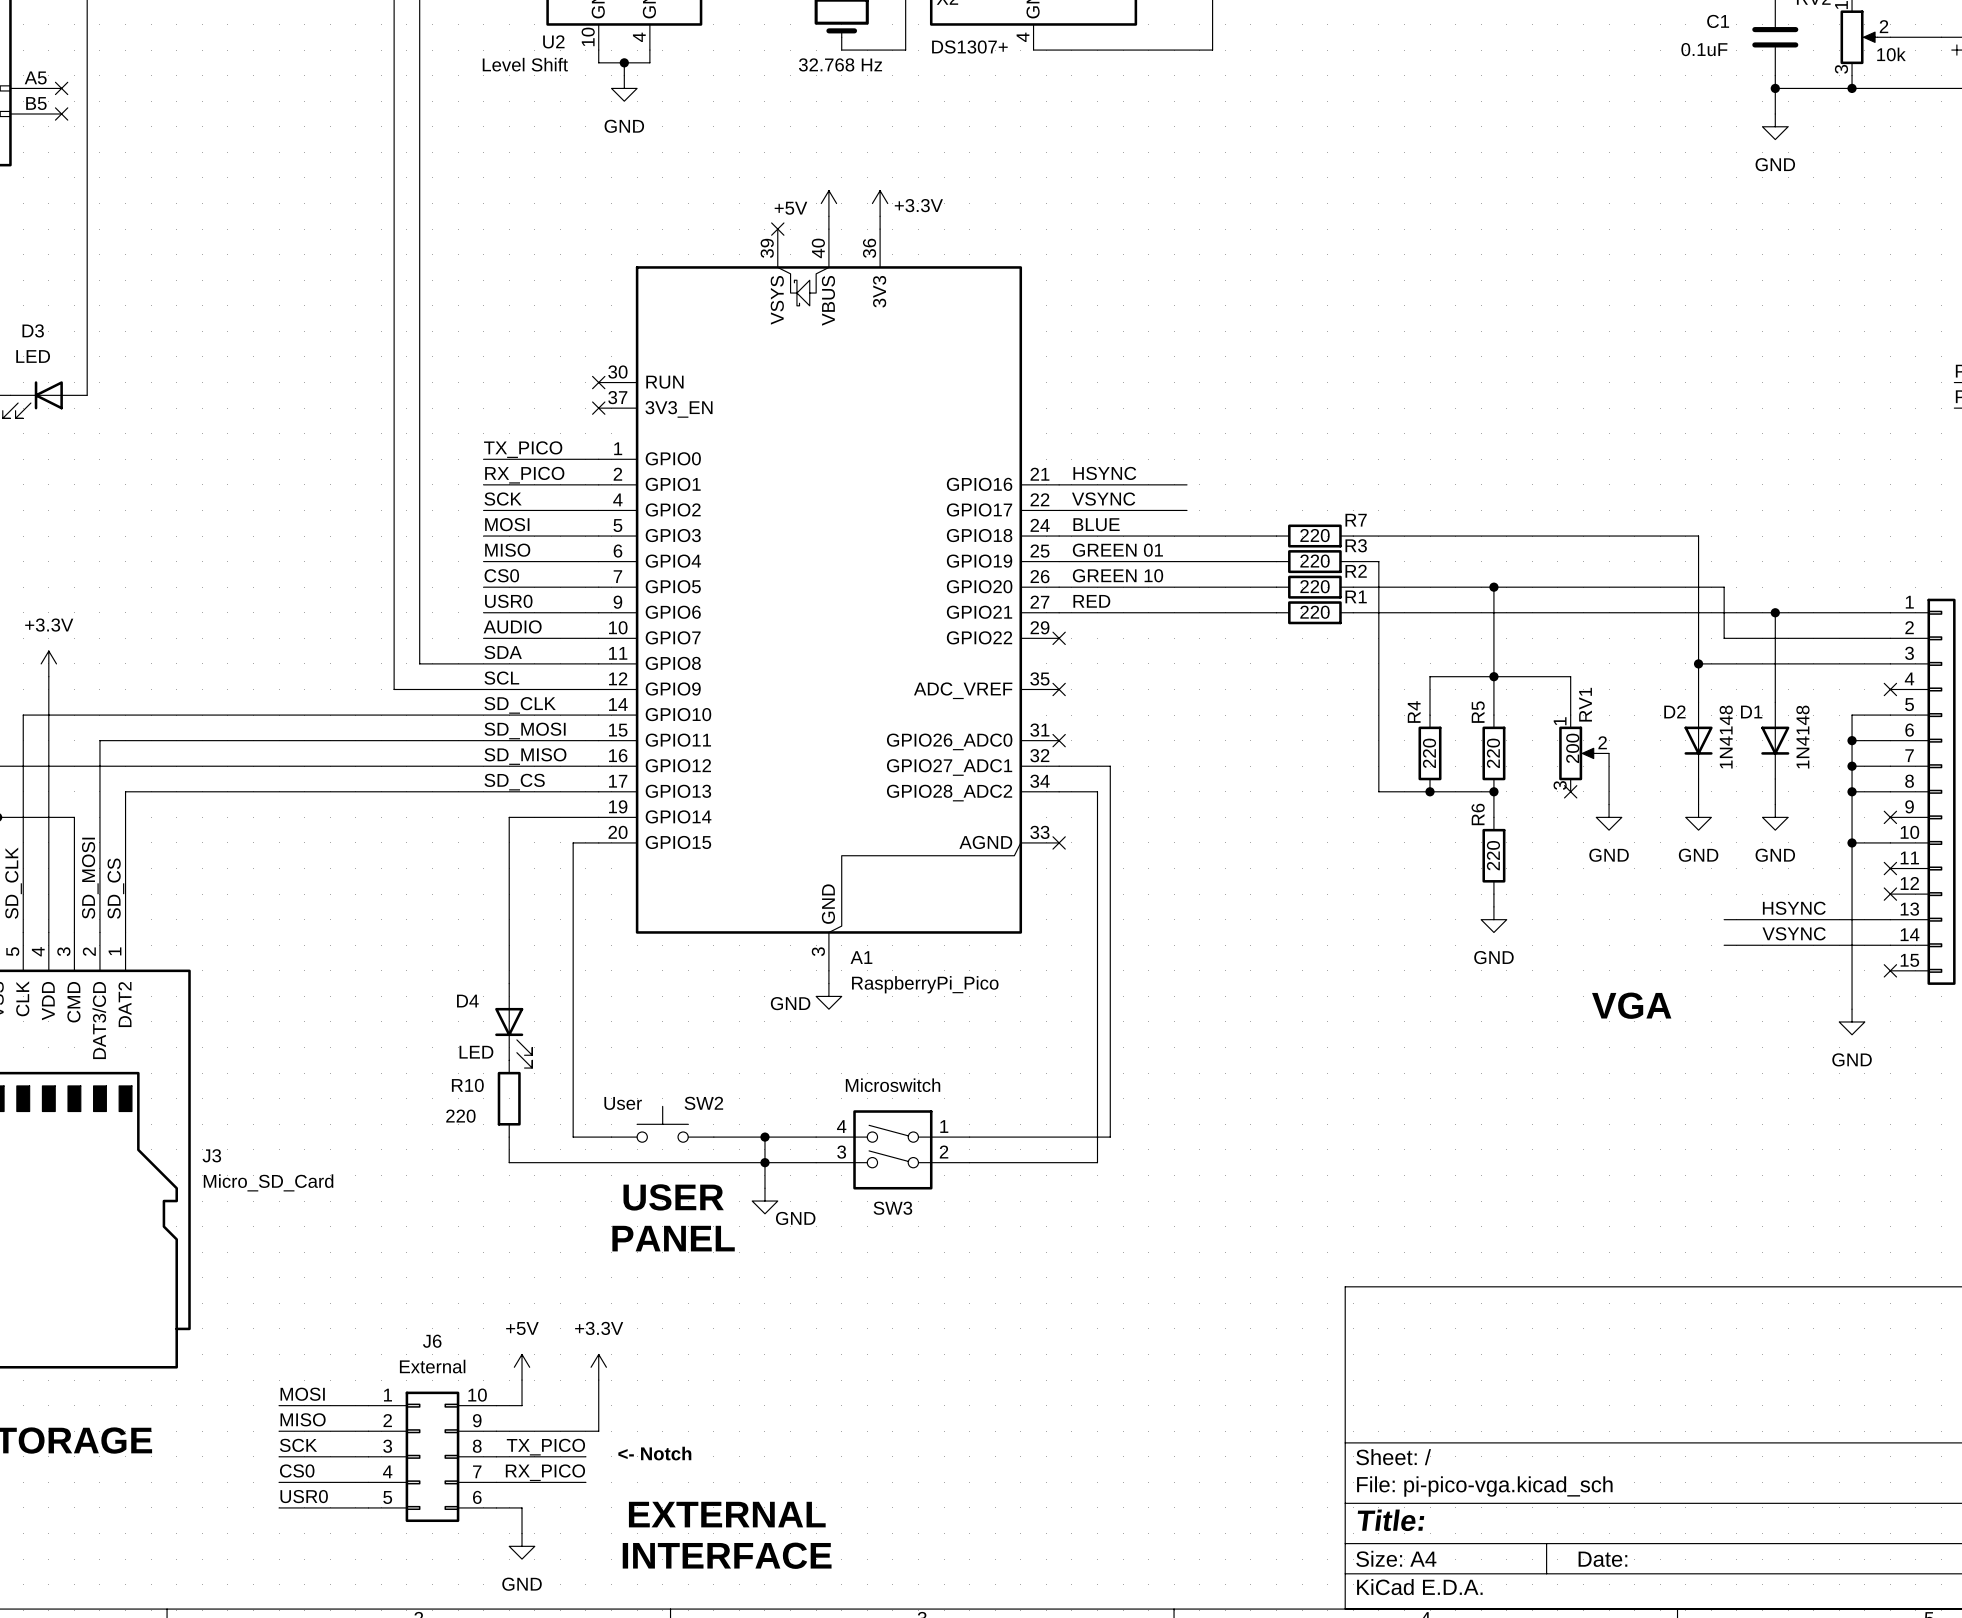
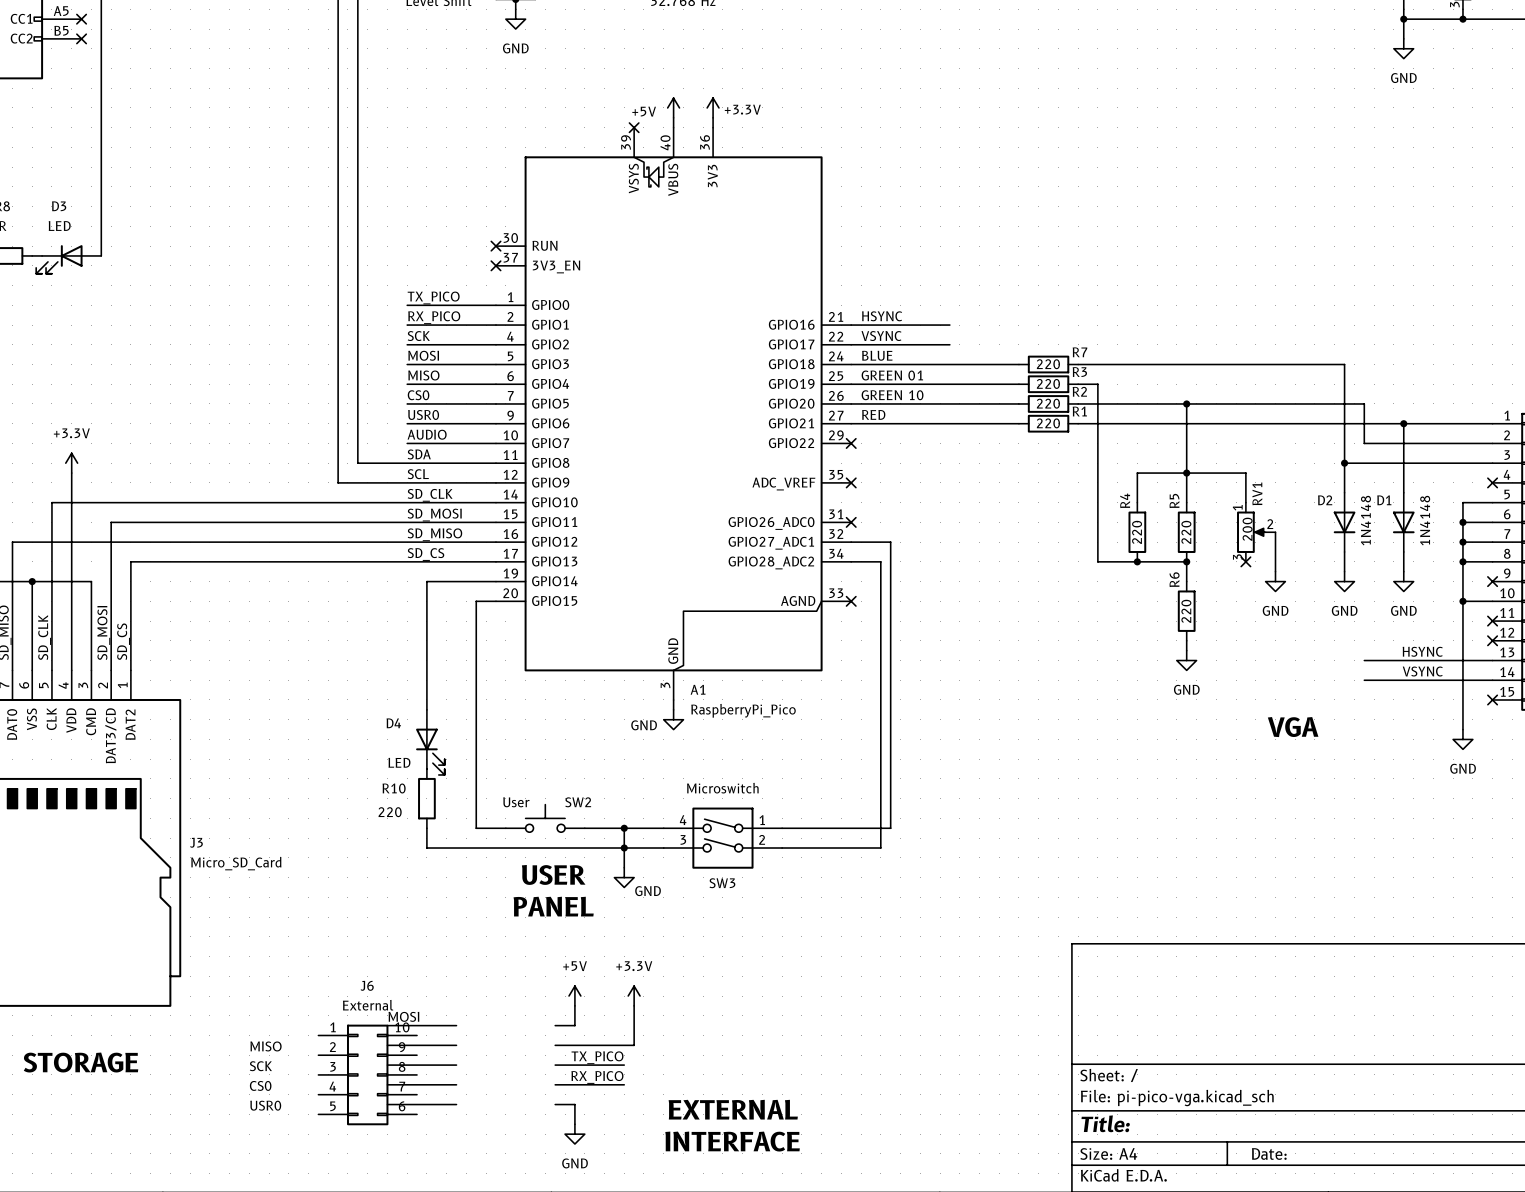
power symbol position: +5V (522, 1367) -> +5V (574, 996)
power symbol position: +3.3V (598, 1367) -> +3.3V (634, 996)
wire: (522, 1380) (522, 1405) (496, 1405) -> (574, 1005) (574, 1025) (555, 1025)
wire: (598, 1380) (598, 1431) (496, 1431) -> (634, 1005) (634, 1045) (555, 1045)
label position: MOSI (302, 1394) -> MOSI (403, 1016)
wire: (279, 1405) (368, 1405) -> (387, 1025) (456, 1025)
wire: (279, 1431) (368, 1431) -> (387, 1045) (456, 1045)
label position: TX_PICO (545, 1447) -> TX_PICO (597, 1057)
text: <- Notch (654, 1453) -> none
wire: (279, 1456) (368, 1456) -> (387, 1065) (456, 1065)
wire: (496, 1456) (585, 1456) -> (555, 1065) (624, 1065)
label position: RX_PICO (545, 1472) -> RX_PICO (597, 1077)
wire: (279, 1482) (368, 1482) -> (387, 1084) (456, 1084)
wire: (496, 1482) (585, 1482) -> (555, 1084) (624, 1084)
wire: (279, 1507) (368, 1507) -> (387, 1104) (456, 1104)
wire: (496, 1507) (522, 1507) (522, 1533) -> (555, 1104) (574, 1104) (574, 1124)
text position: EXTERNAL (727, 1514) -> EXTERNAL (733, 1109)
power symbol position: GND (522, 1546) -> GND (574, 1134)
text position: INTERFACE (727, 1555) -> INTERFACE (732, 1141)

